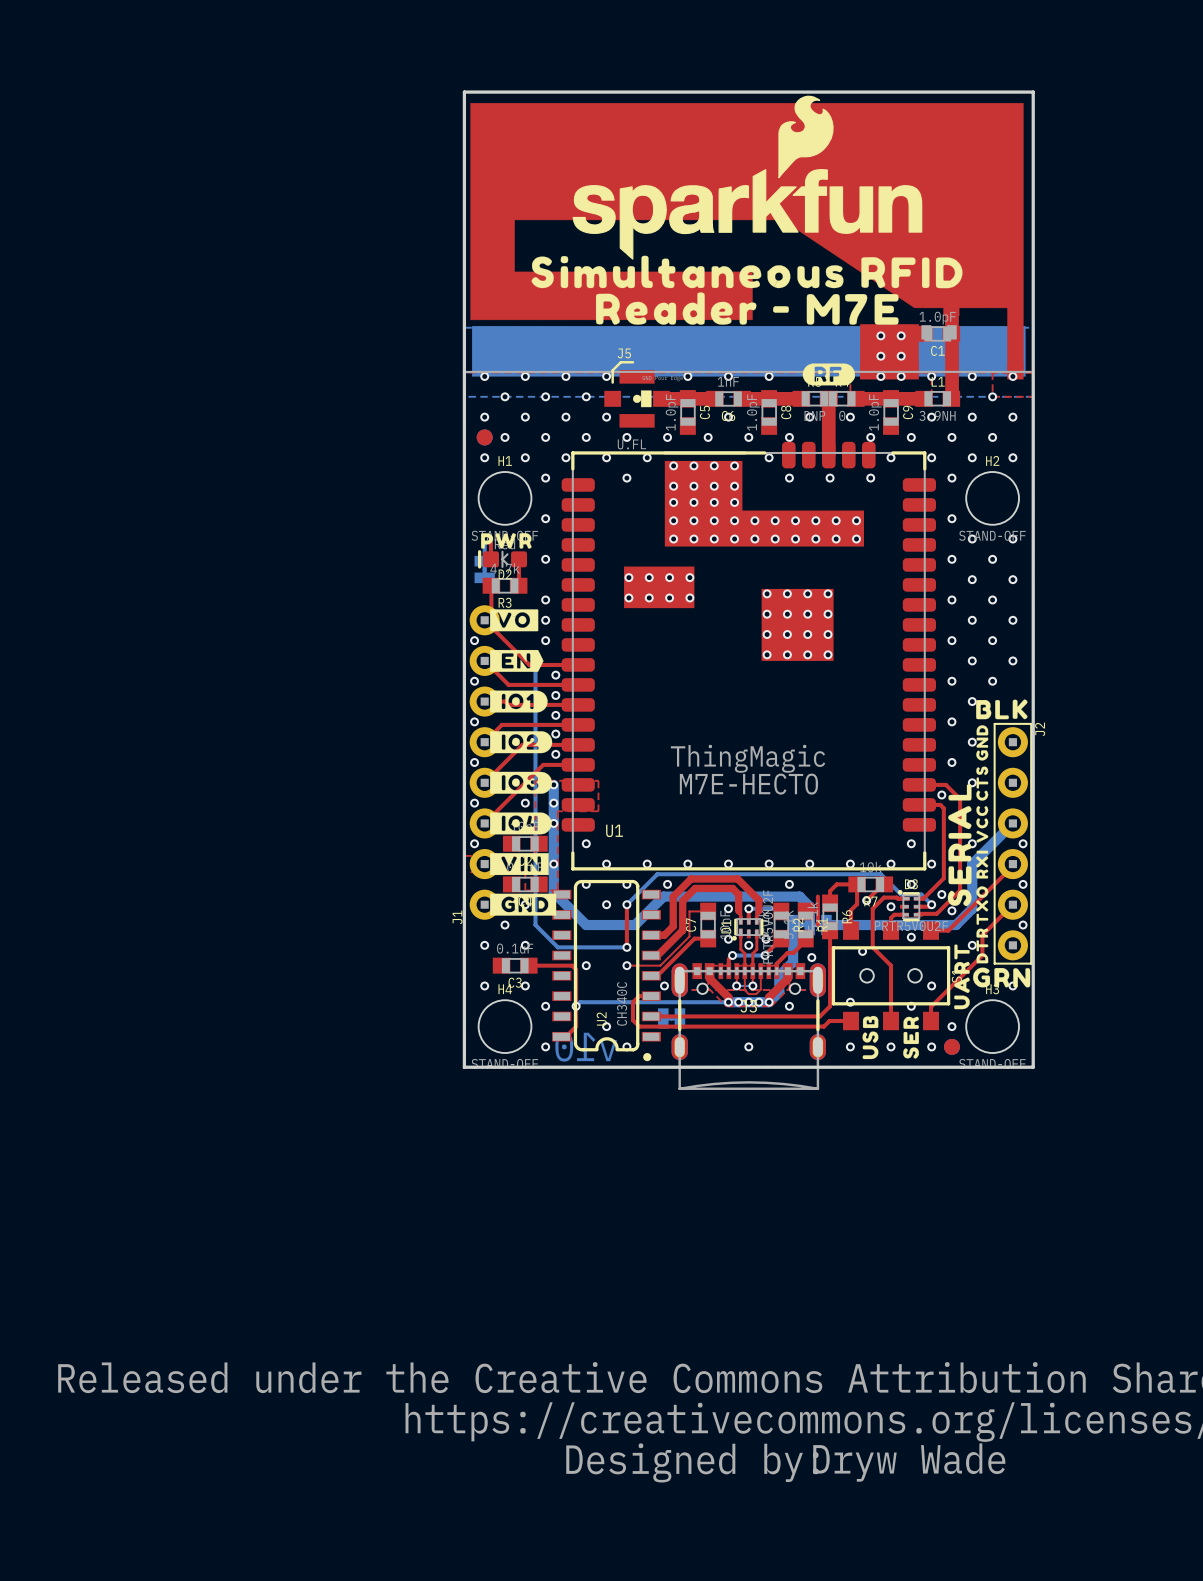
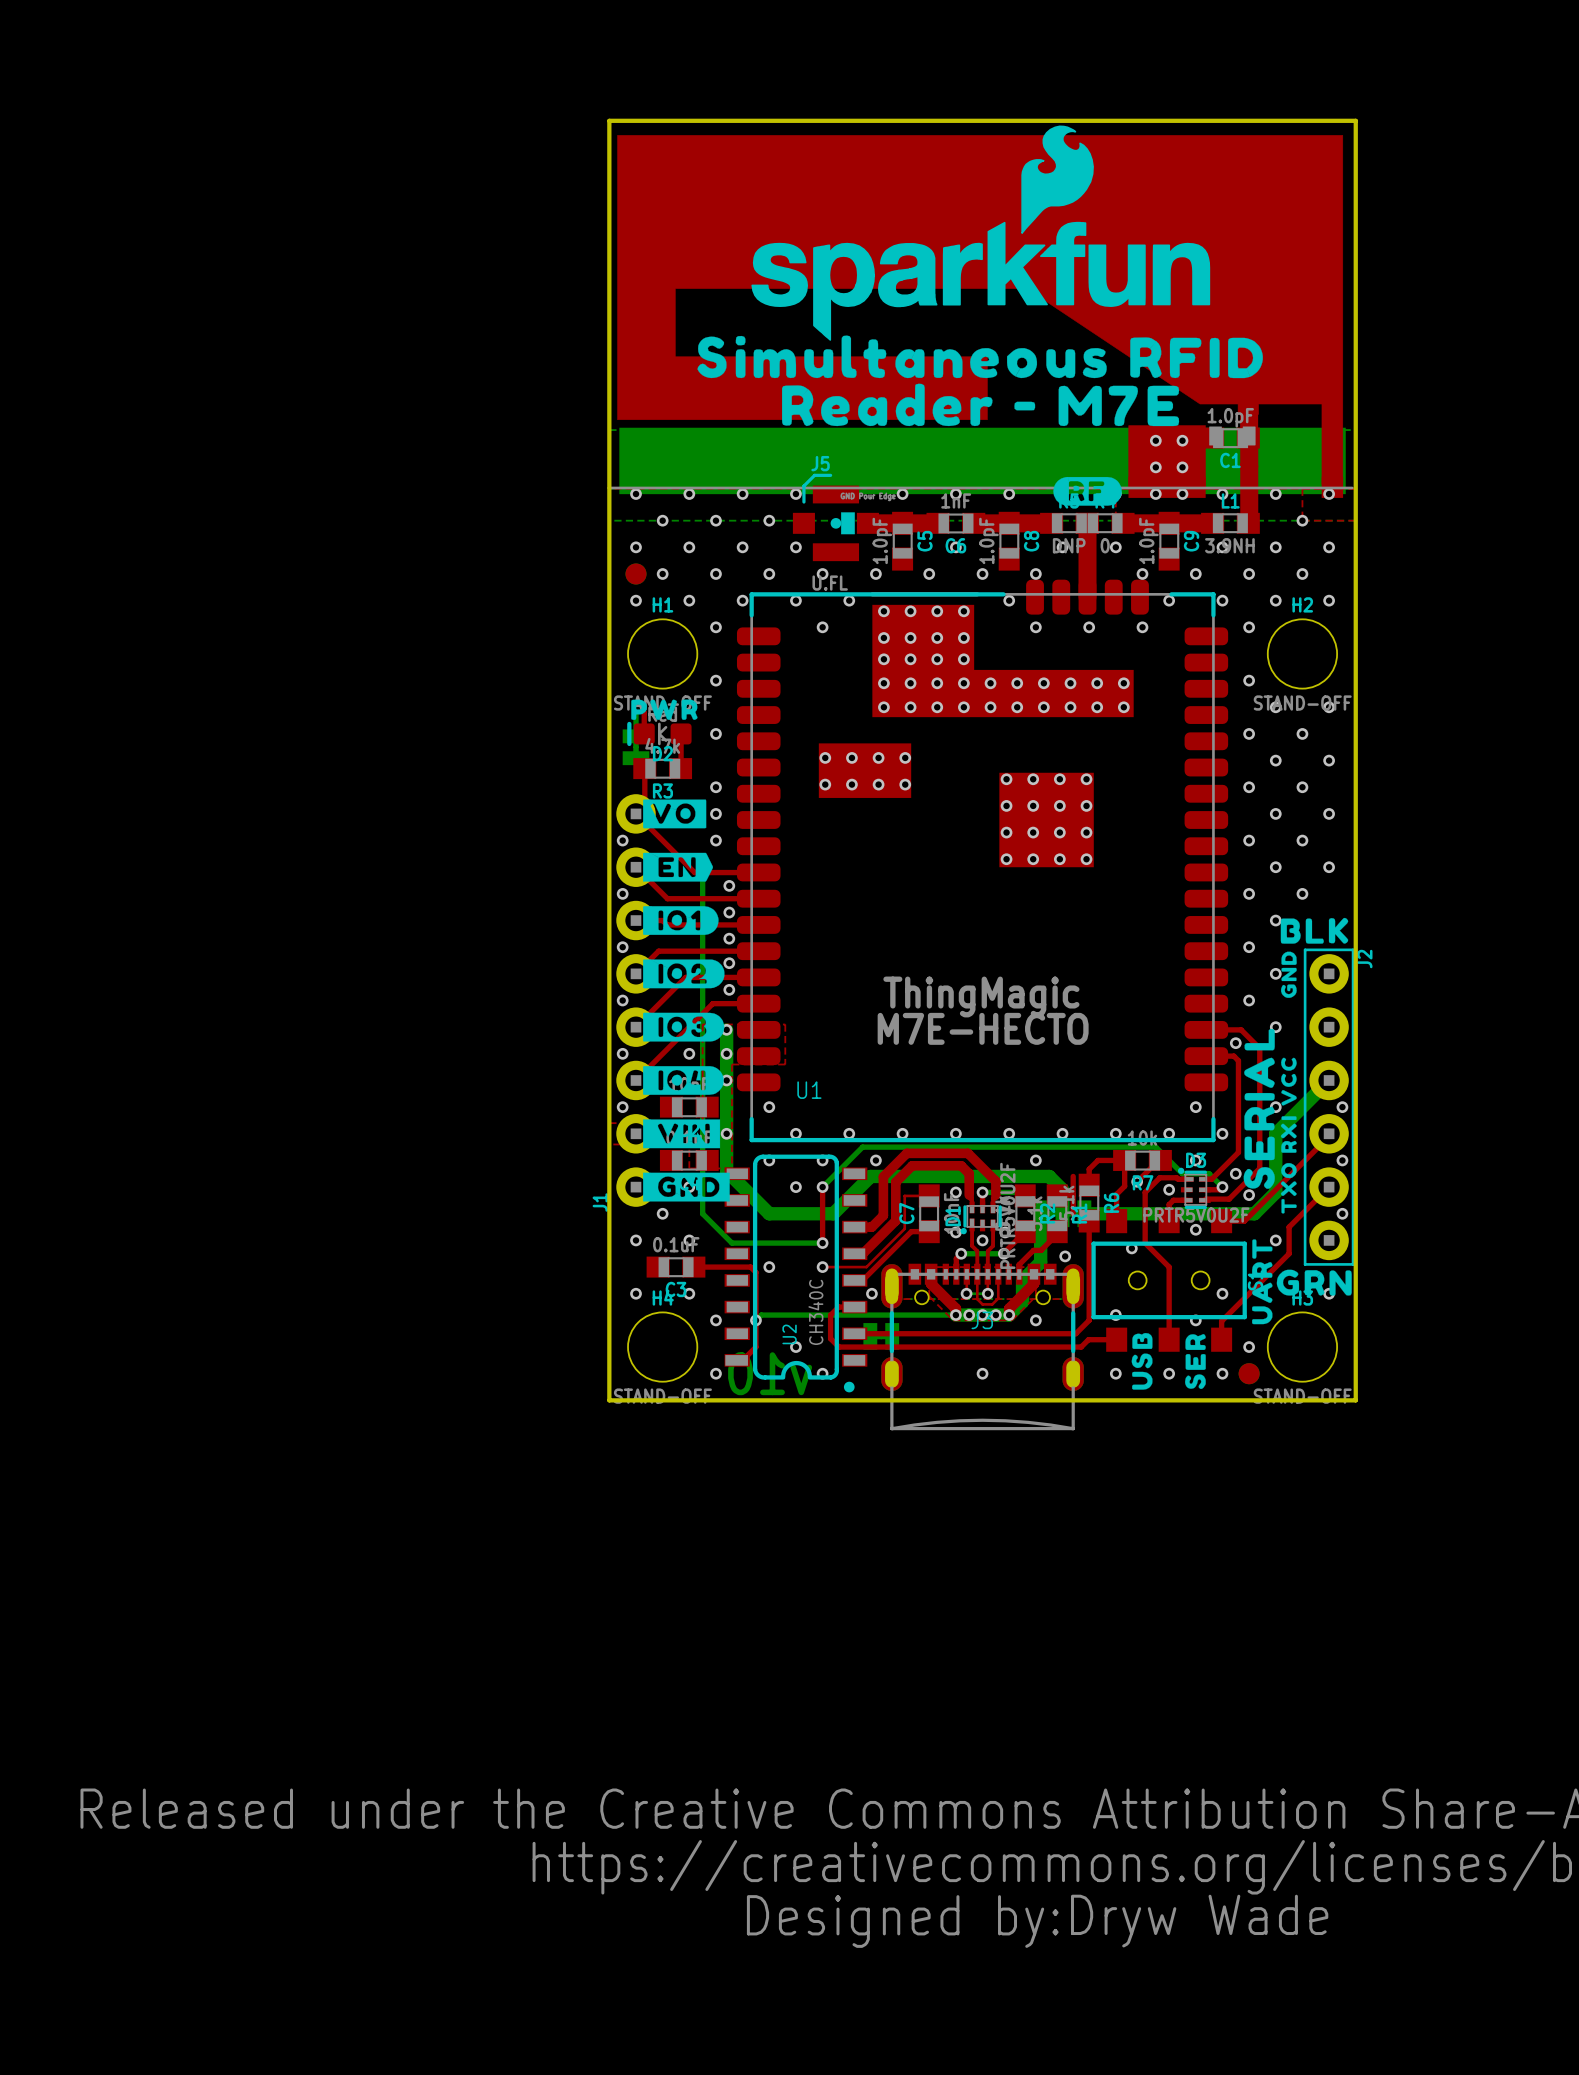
drawing: [976, 766, 989, 801] -> none
drawing: [976, 928, 989, 964] -> none

